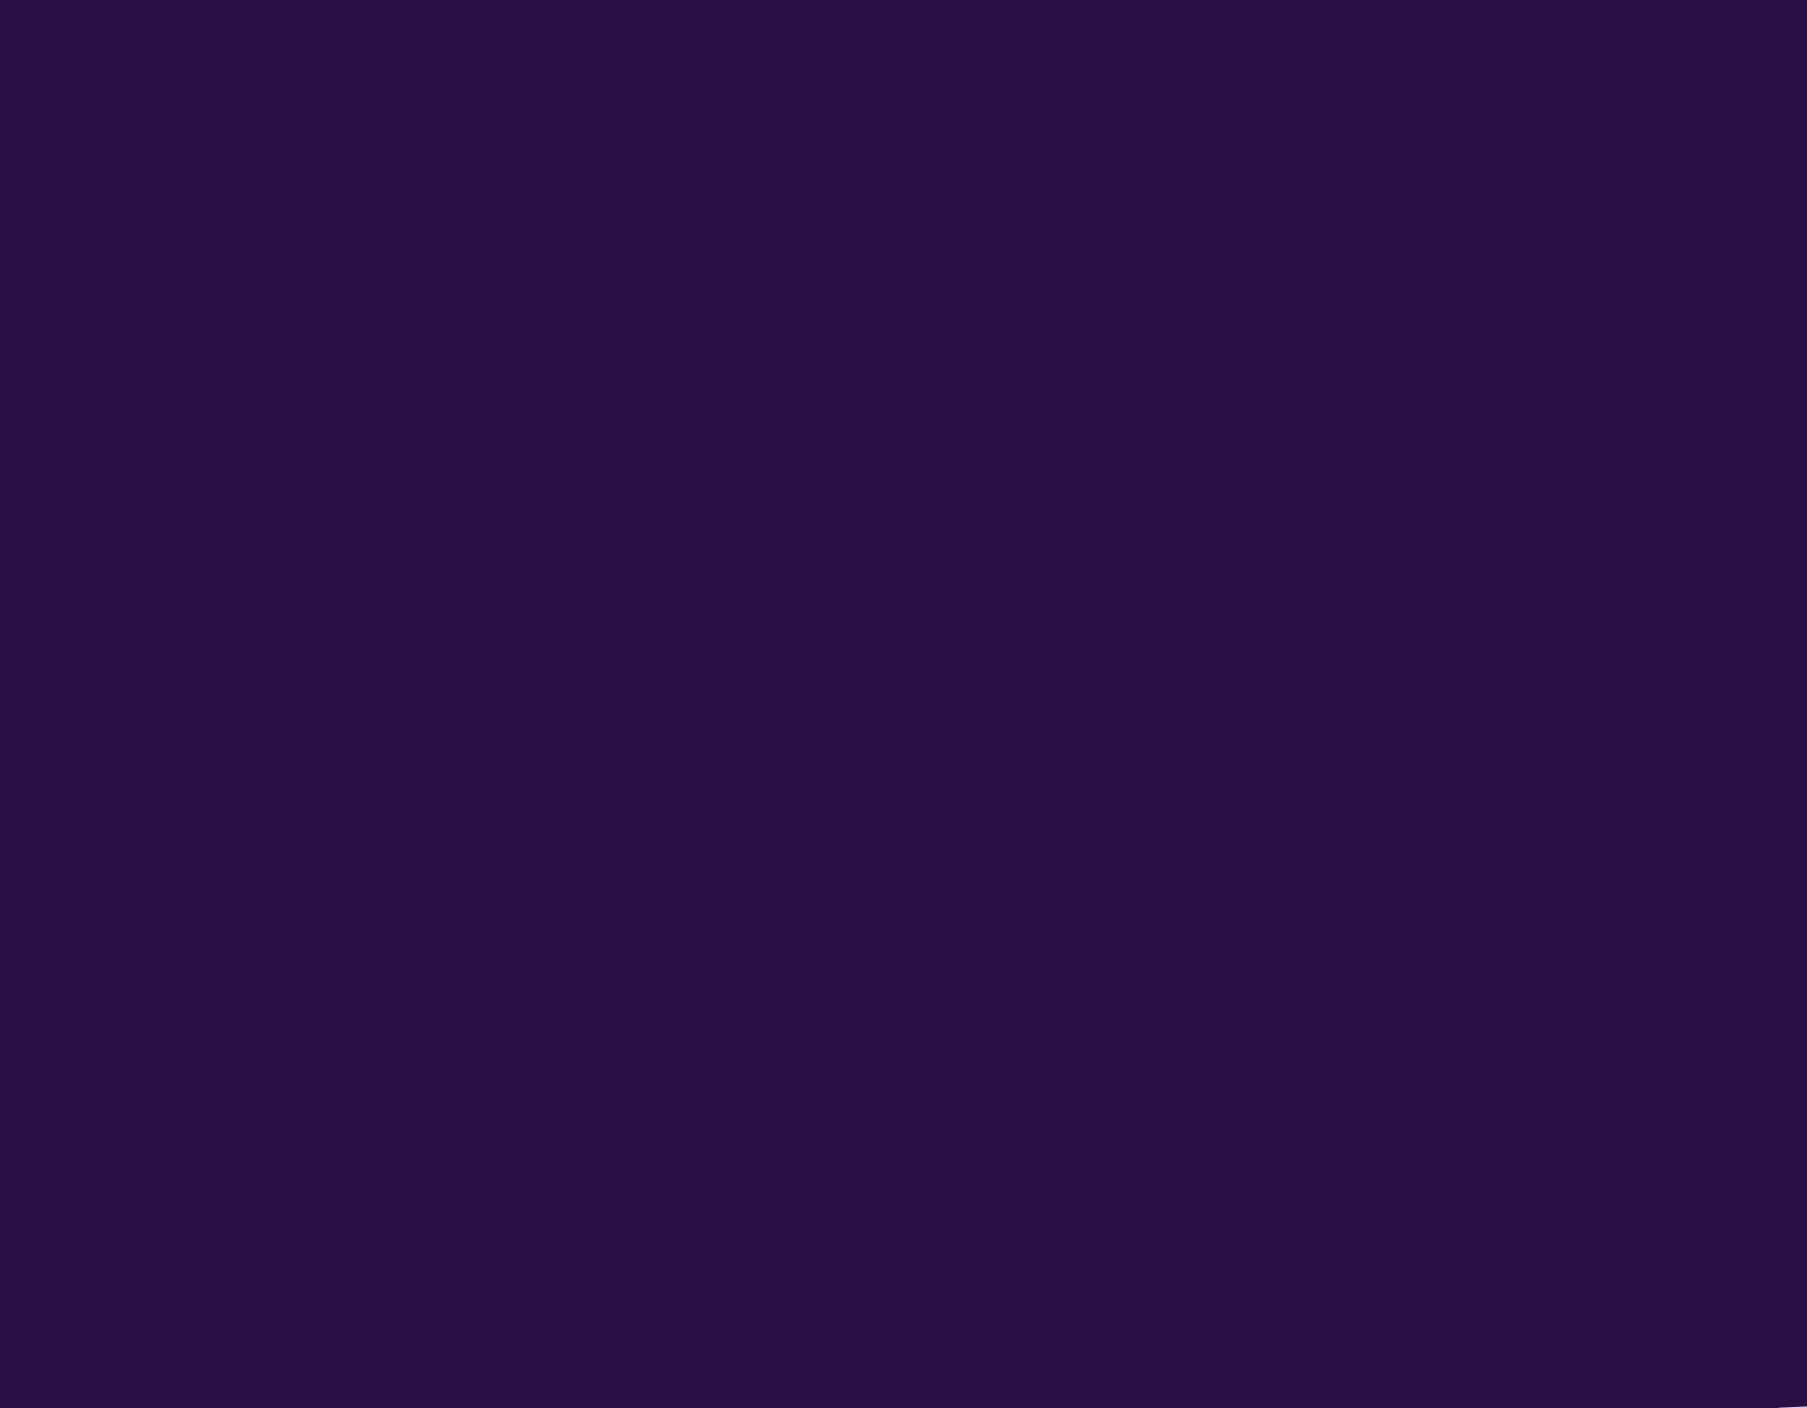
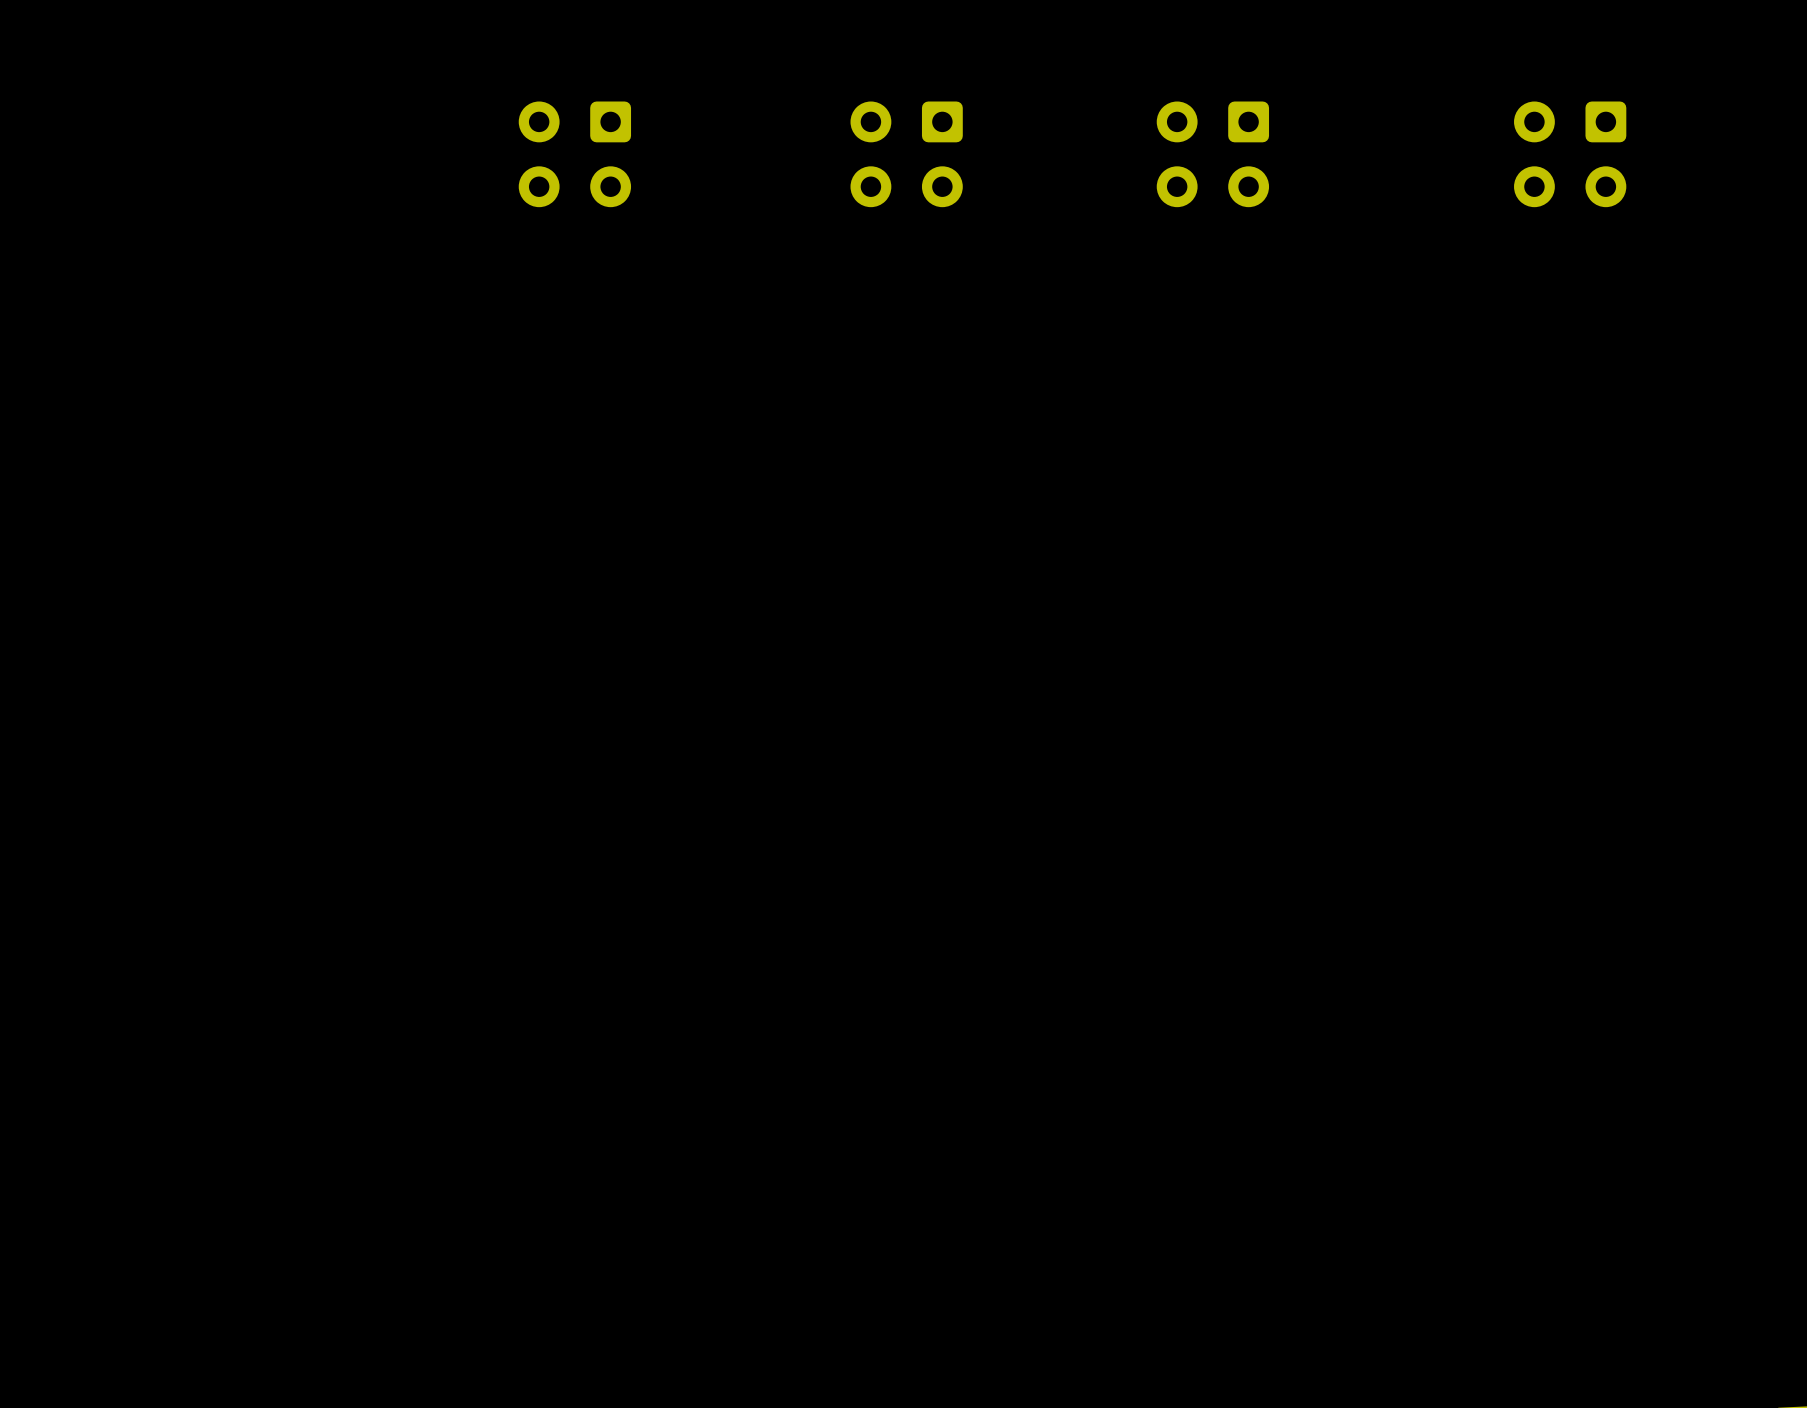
part: none -> (574, 154)
part: none -> (906, 154)
part: none -> (1212, 154)
part: none -> (1570, 154)

